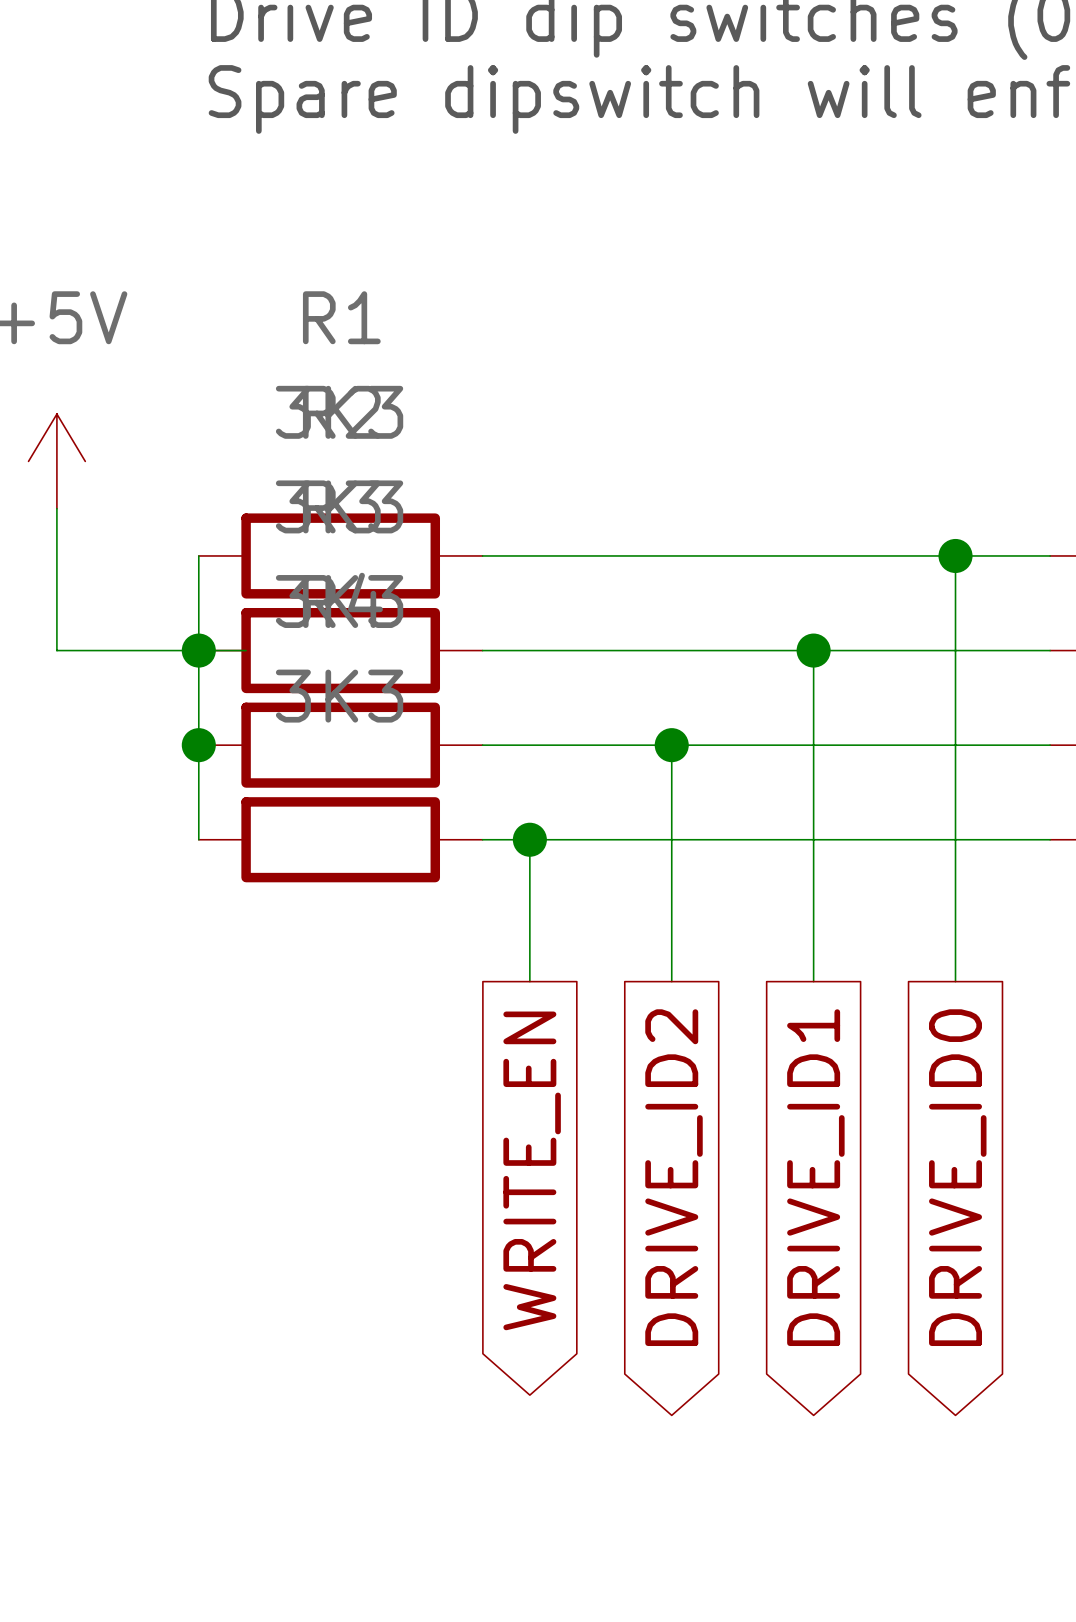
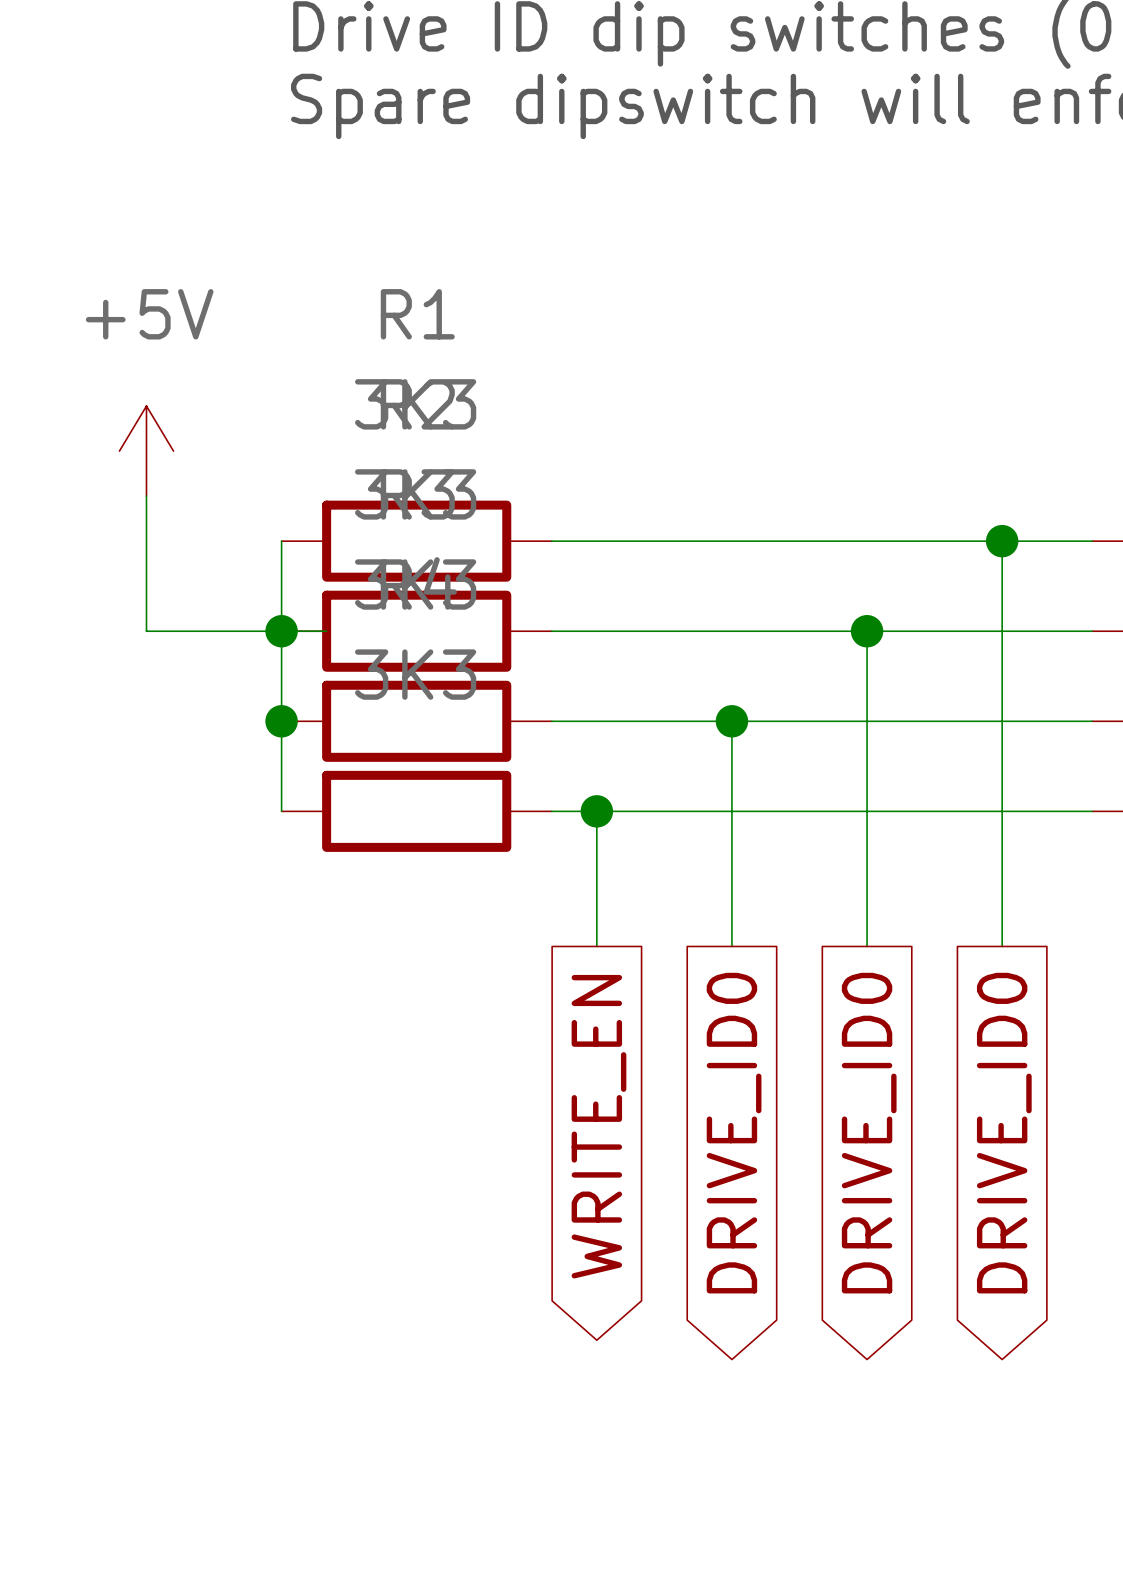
global label: DRIVE_ID2 (674, 1177) -> DRIVE_ID0 (734, 1133)
global label: DRIVE_ID1 (815, 1177) -> DRIVE_ID0 (869, 1133)

